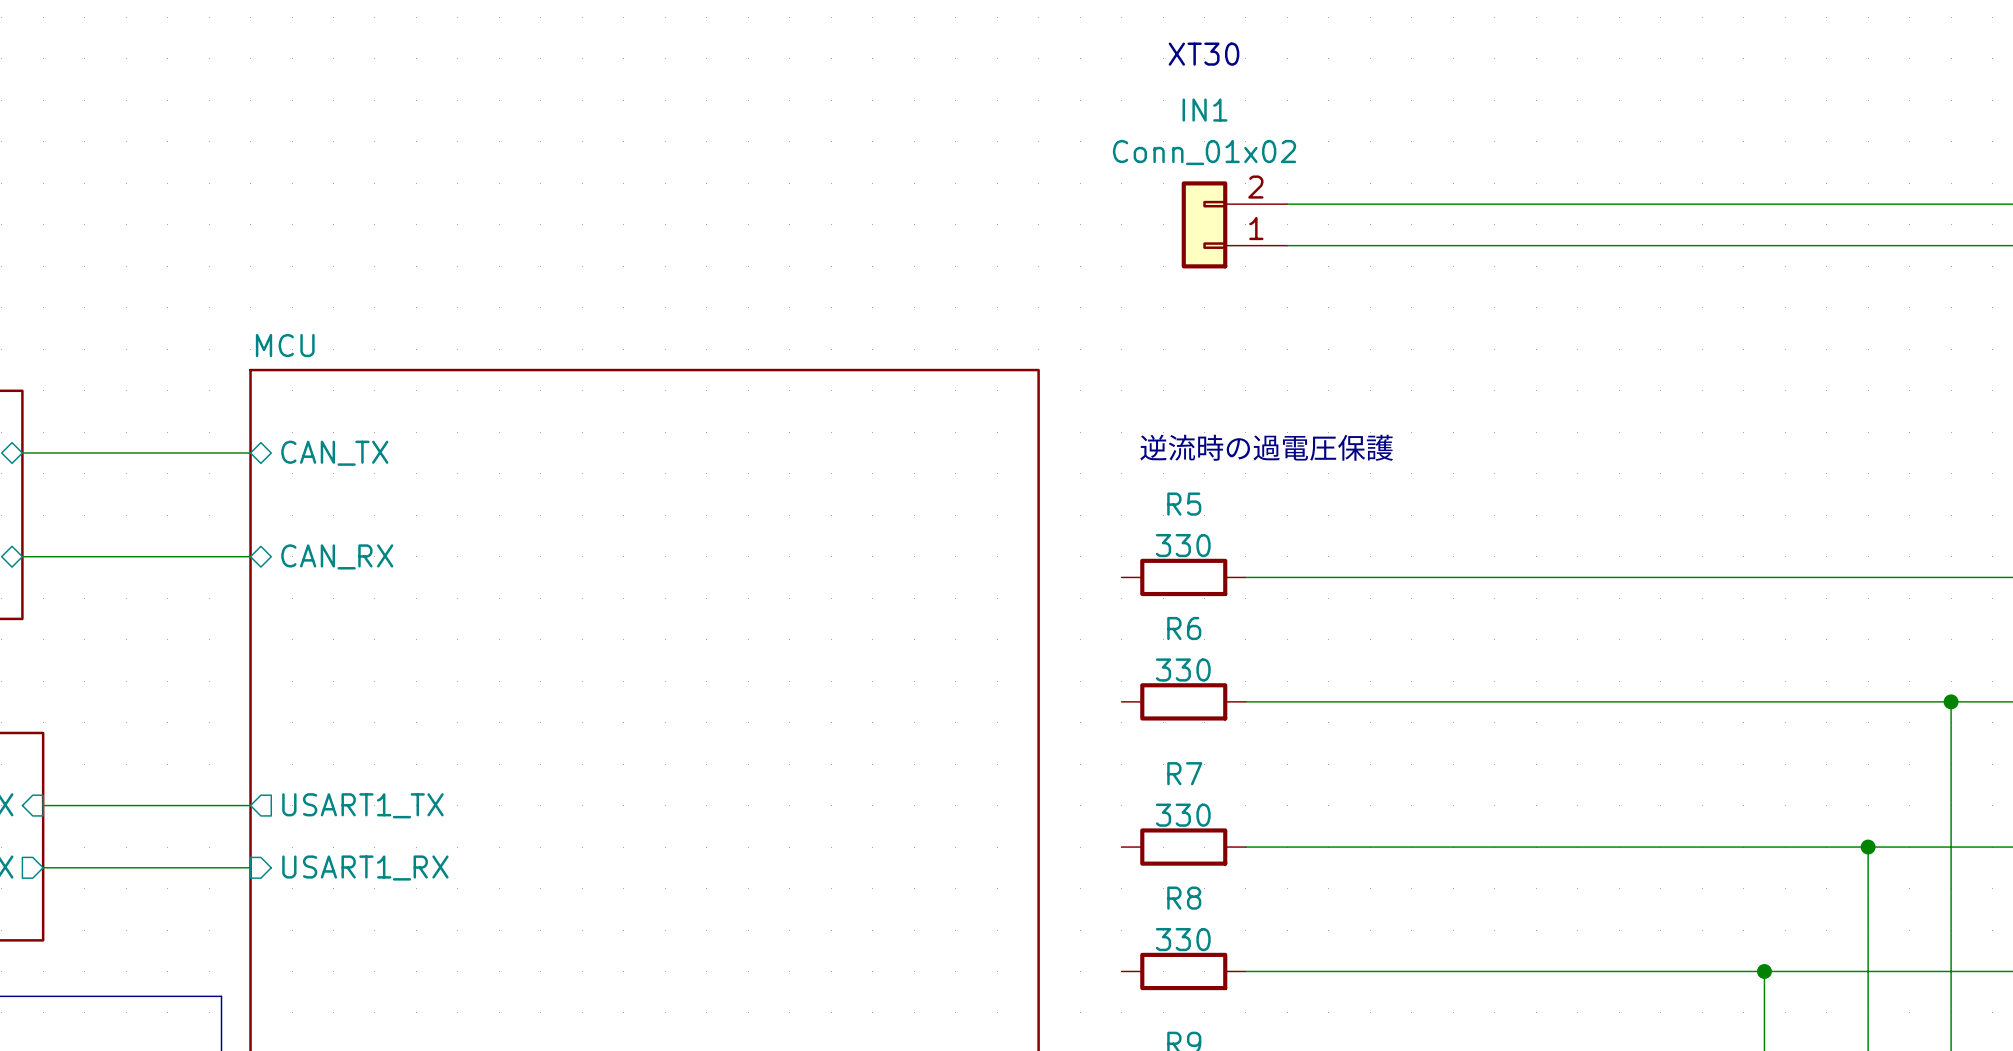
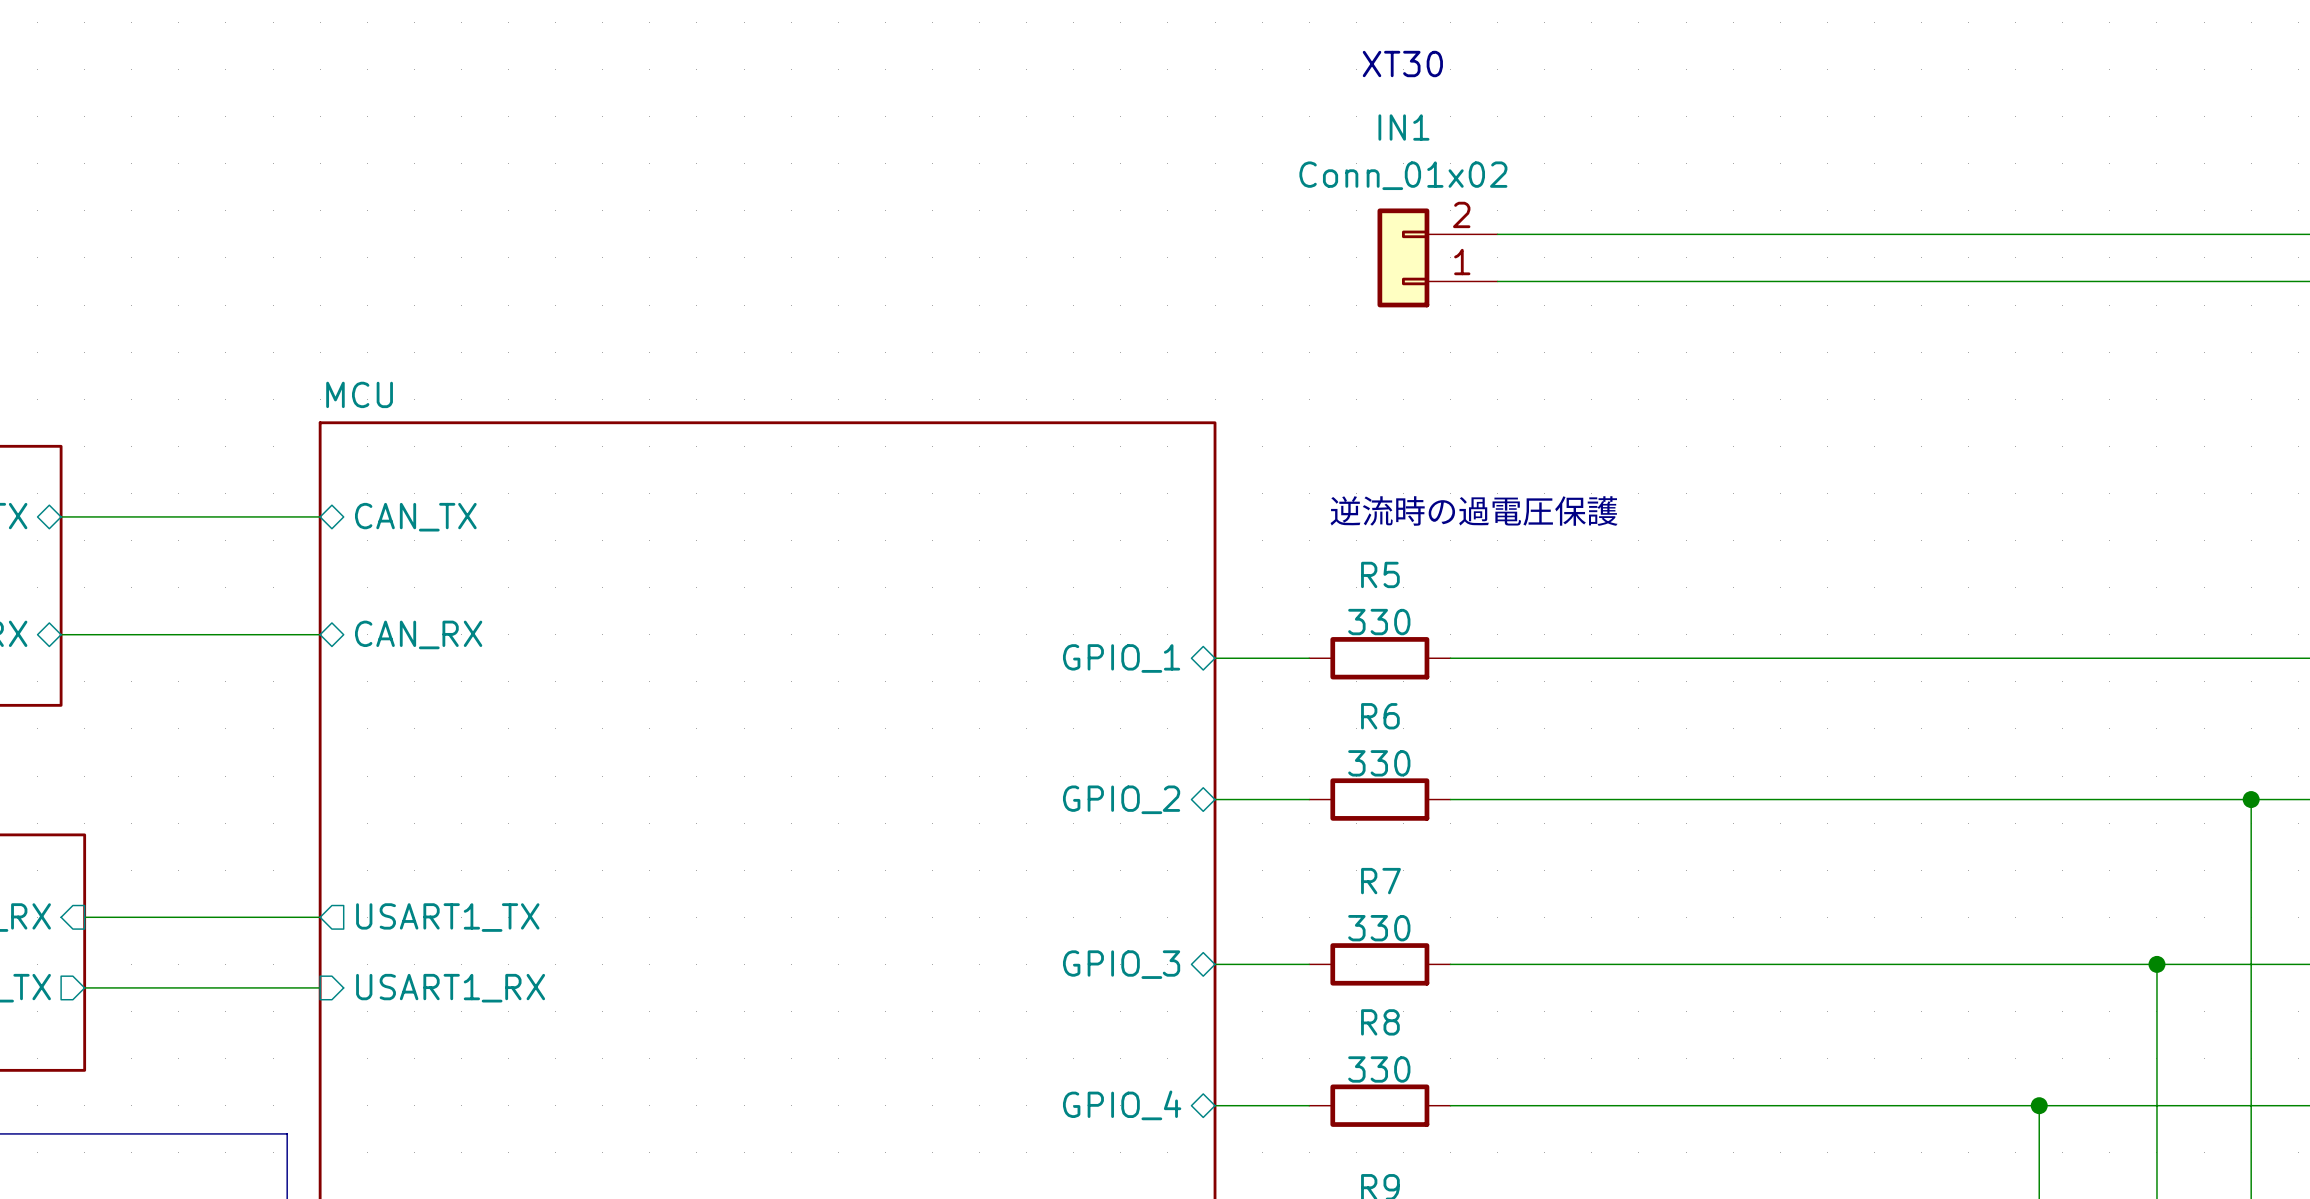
sheet pin: none -> GPIO_1 (1121, 658)
wire: none -> (1215, 658) (1309, 658)
wire: none -> (1215, 799) (1309, 799)
sheet pin: none -> GPIO_2 (1121, 799)
sheet pin: none -> GPIO_3 (1121, 964)
wire: none -> (1215, 964) (1309, 964)
sheet pin: none -> GPIO_4 (1122, 1105)
wire: none -> (1215, 1105) (1309, 1105)

